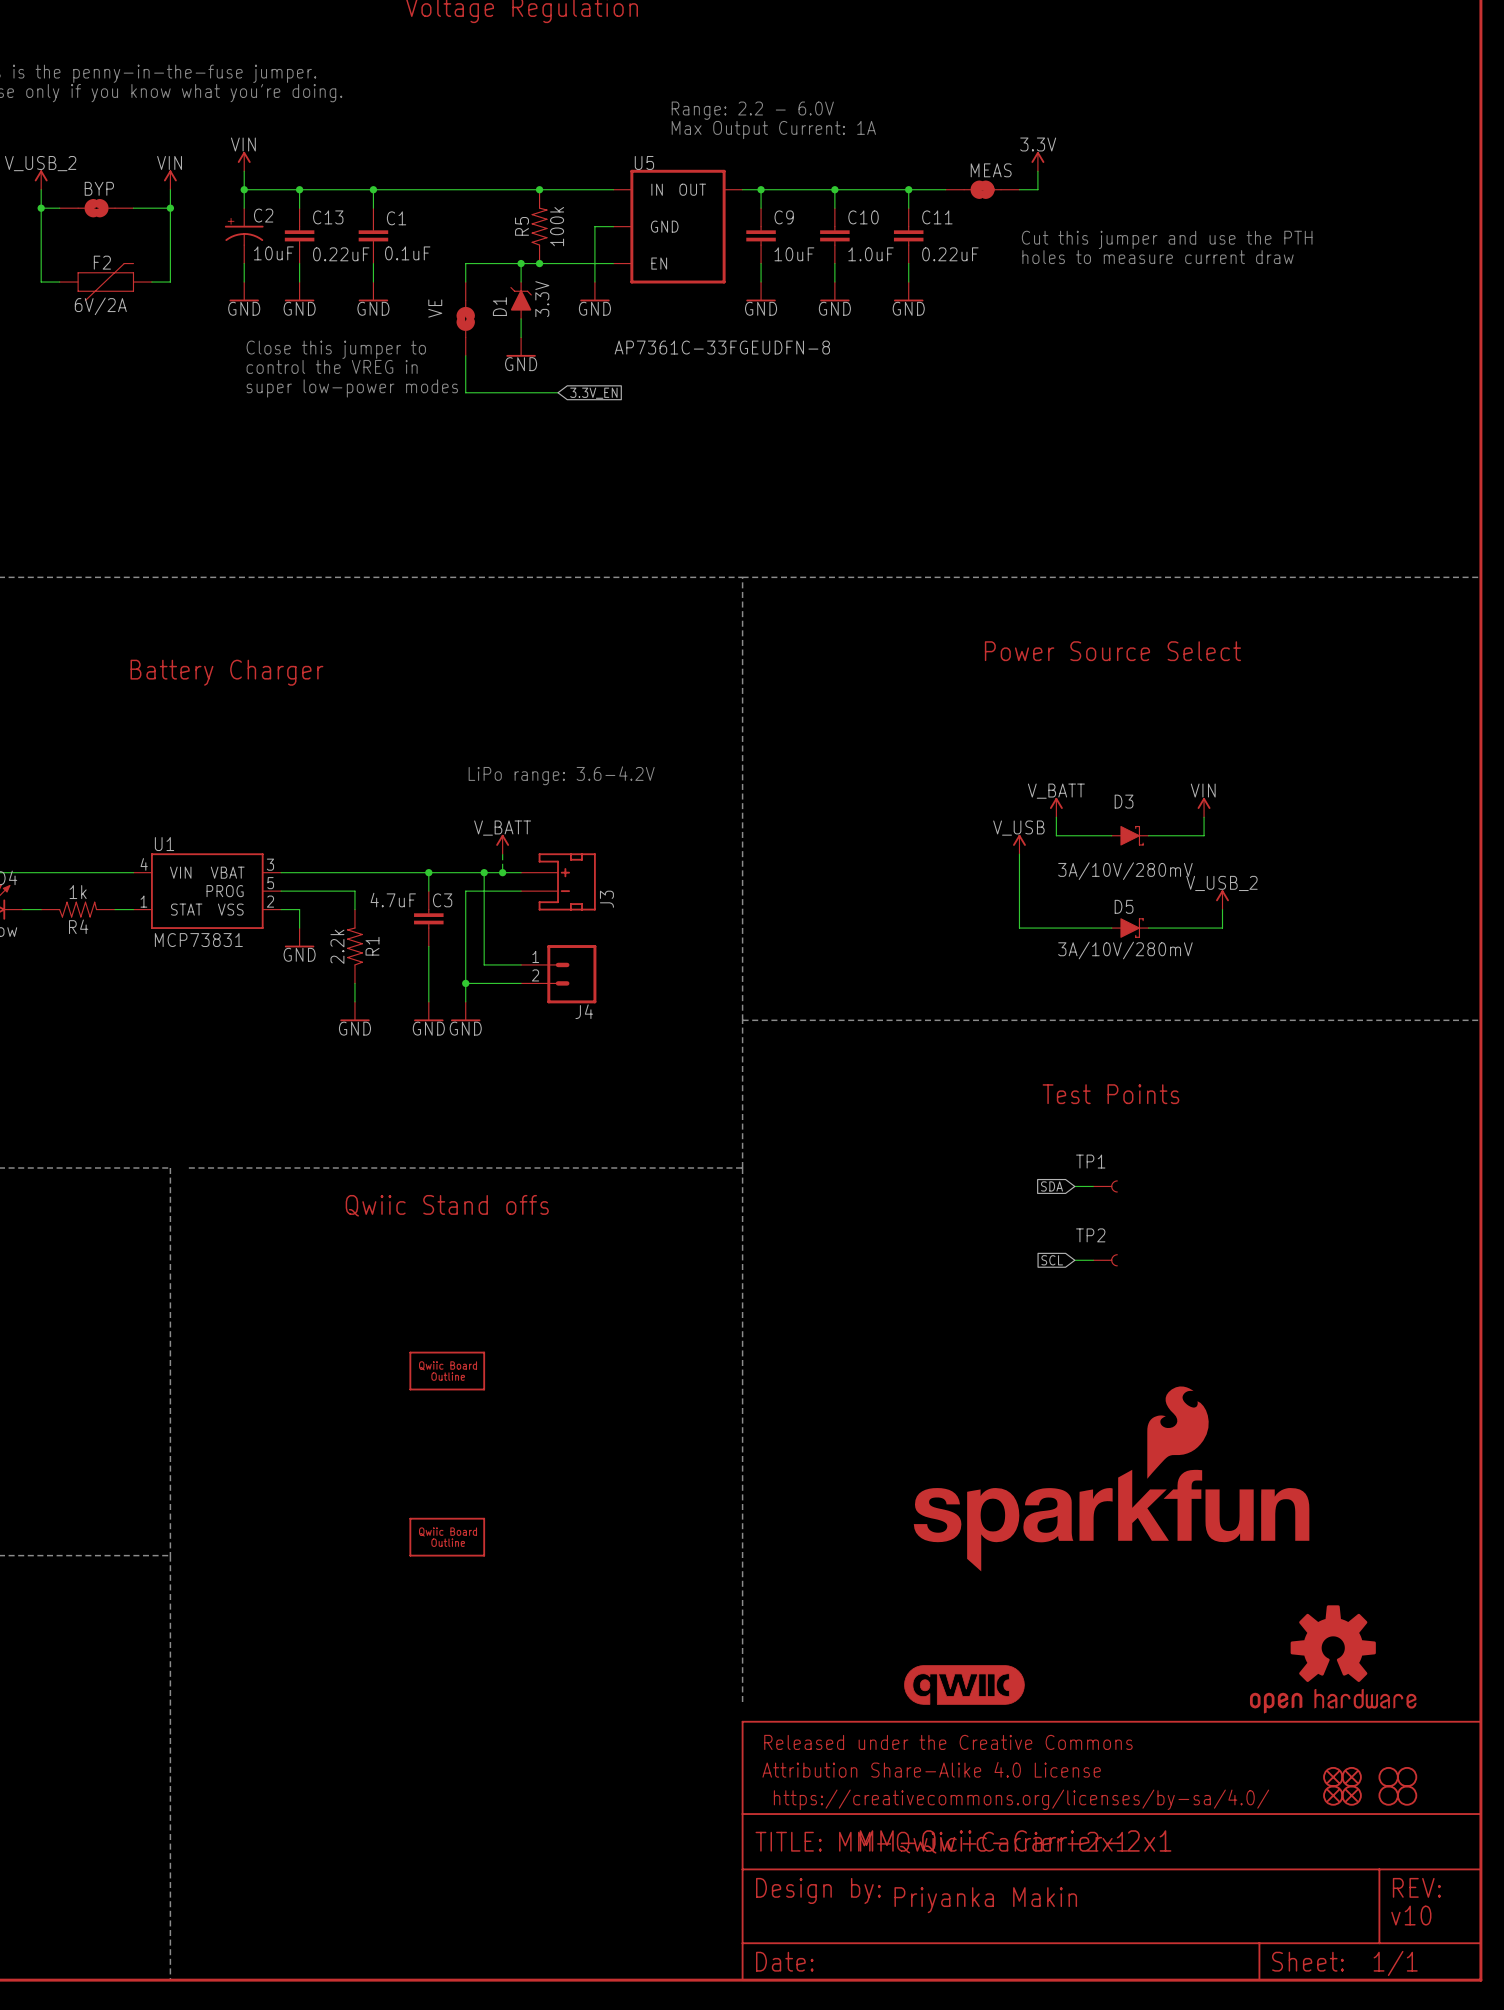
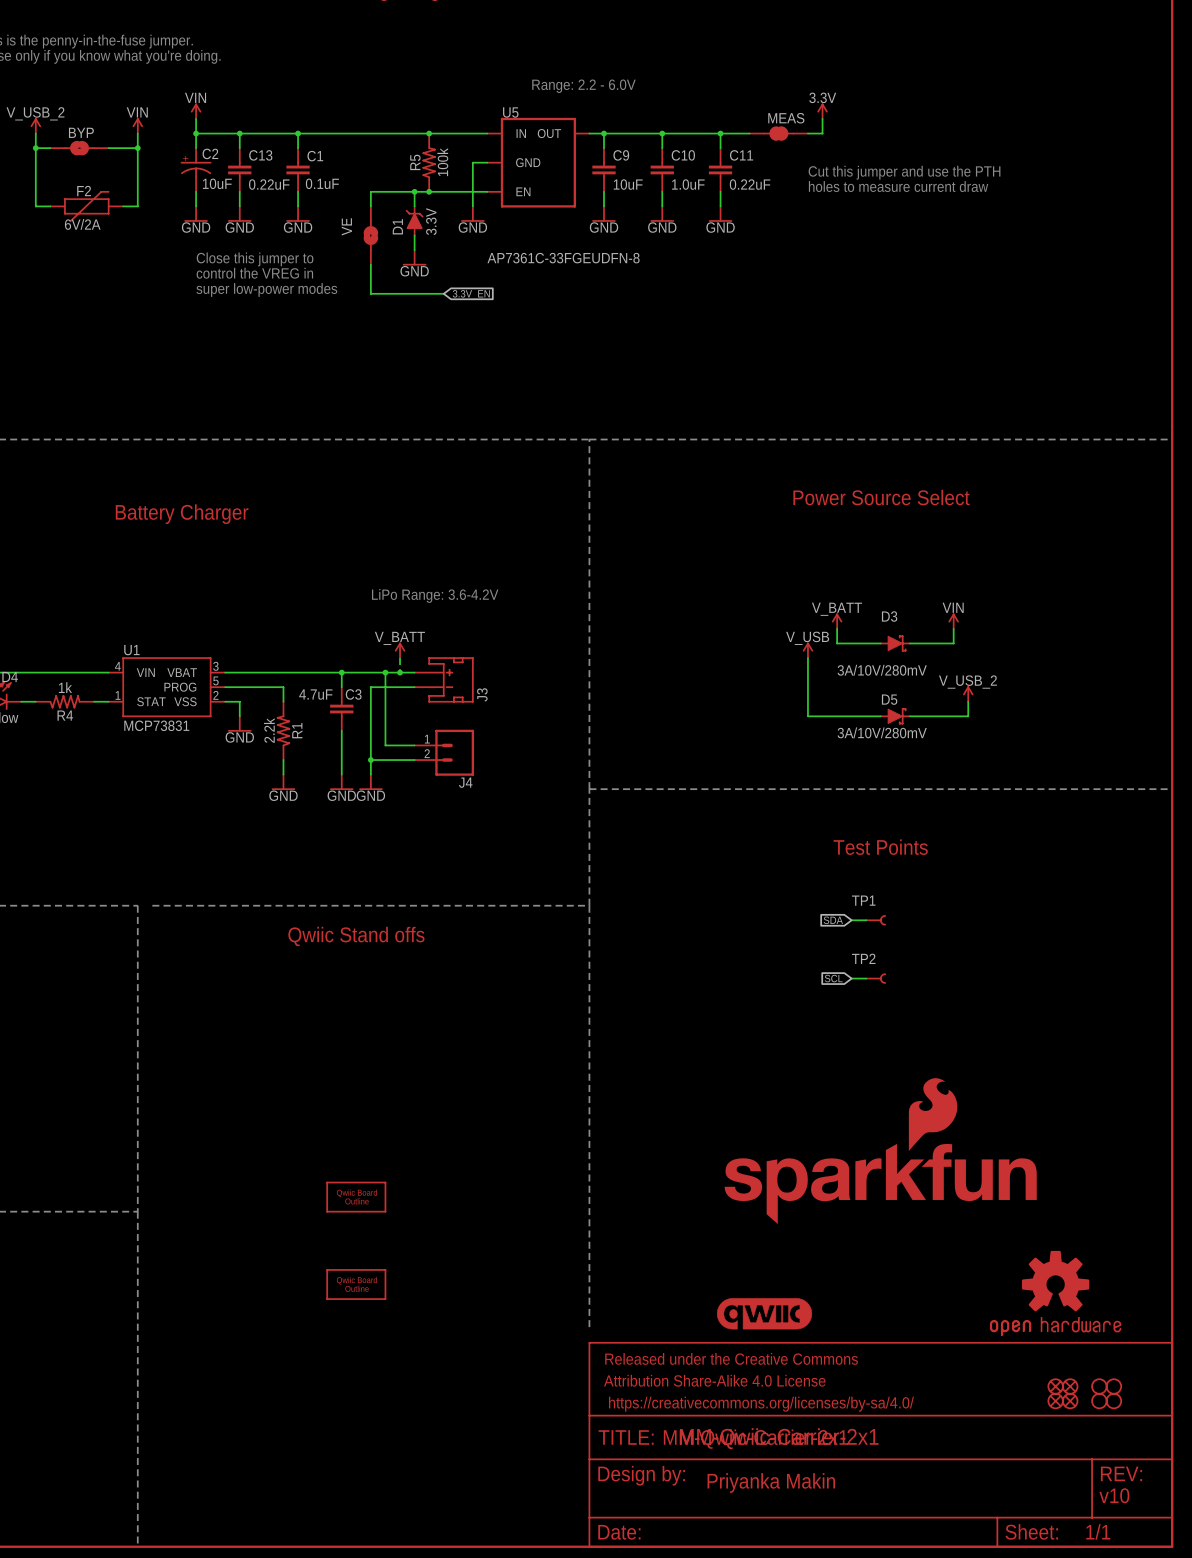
text: Range: 2.2 - 6.0V (752, 110) -> none
text: Max Output Current: 1A (773, 130) -> Range: 2.2 - 6.0V (583, 86)
text: LiPo range: 3.6-4.2V (561, 775) -> LiPo Range: 3.6-4.2V (435, 595)
part: (447, 1371) -> none
part: none -> (356, 1284)

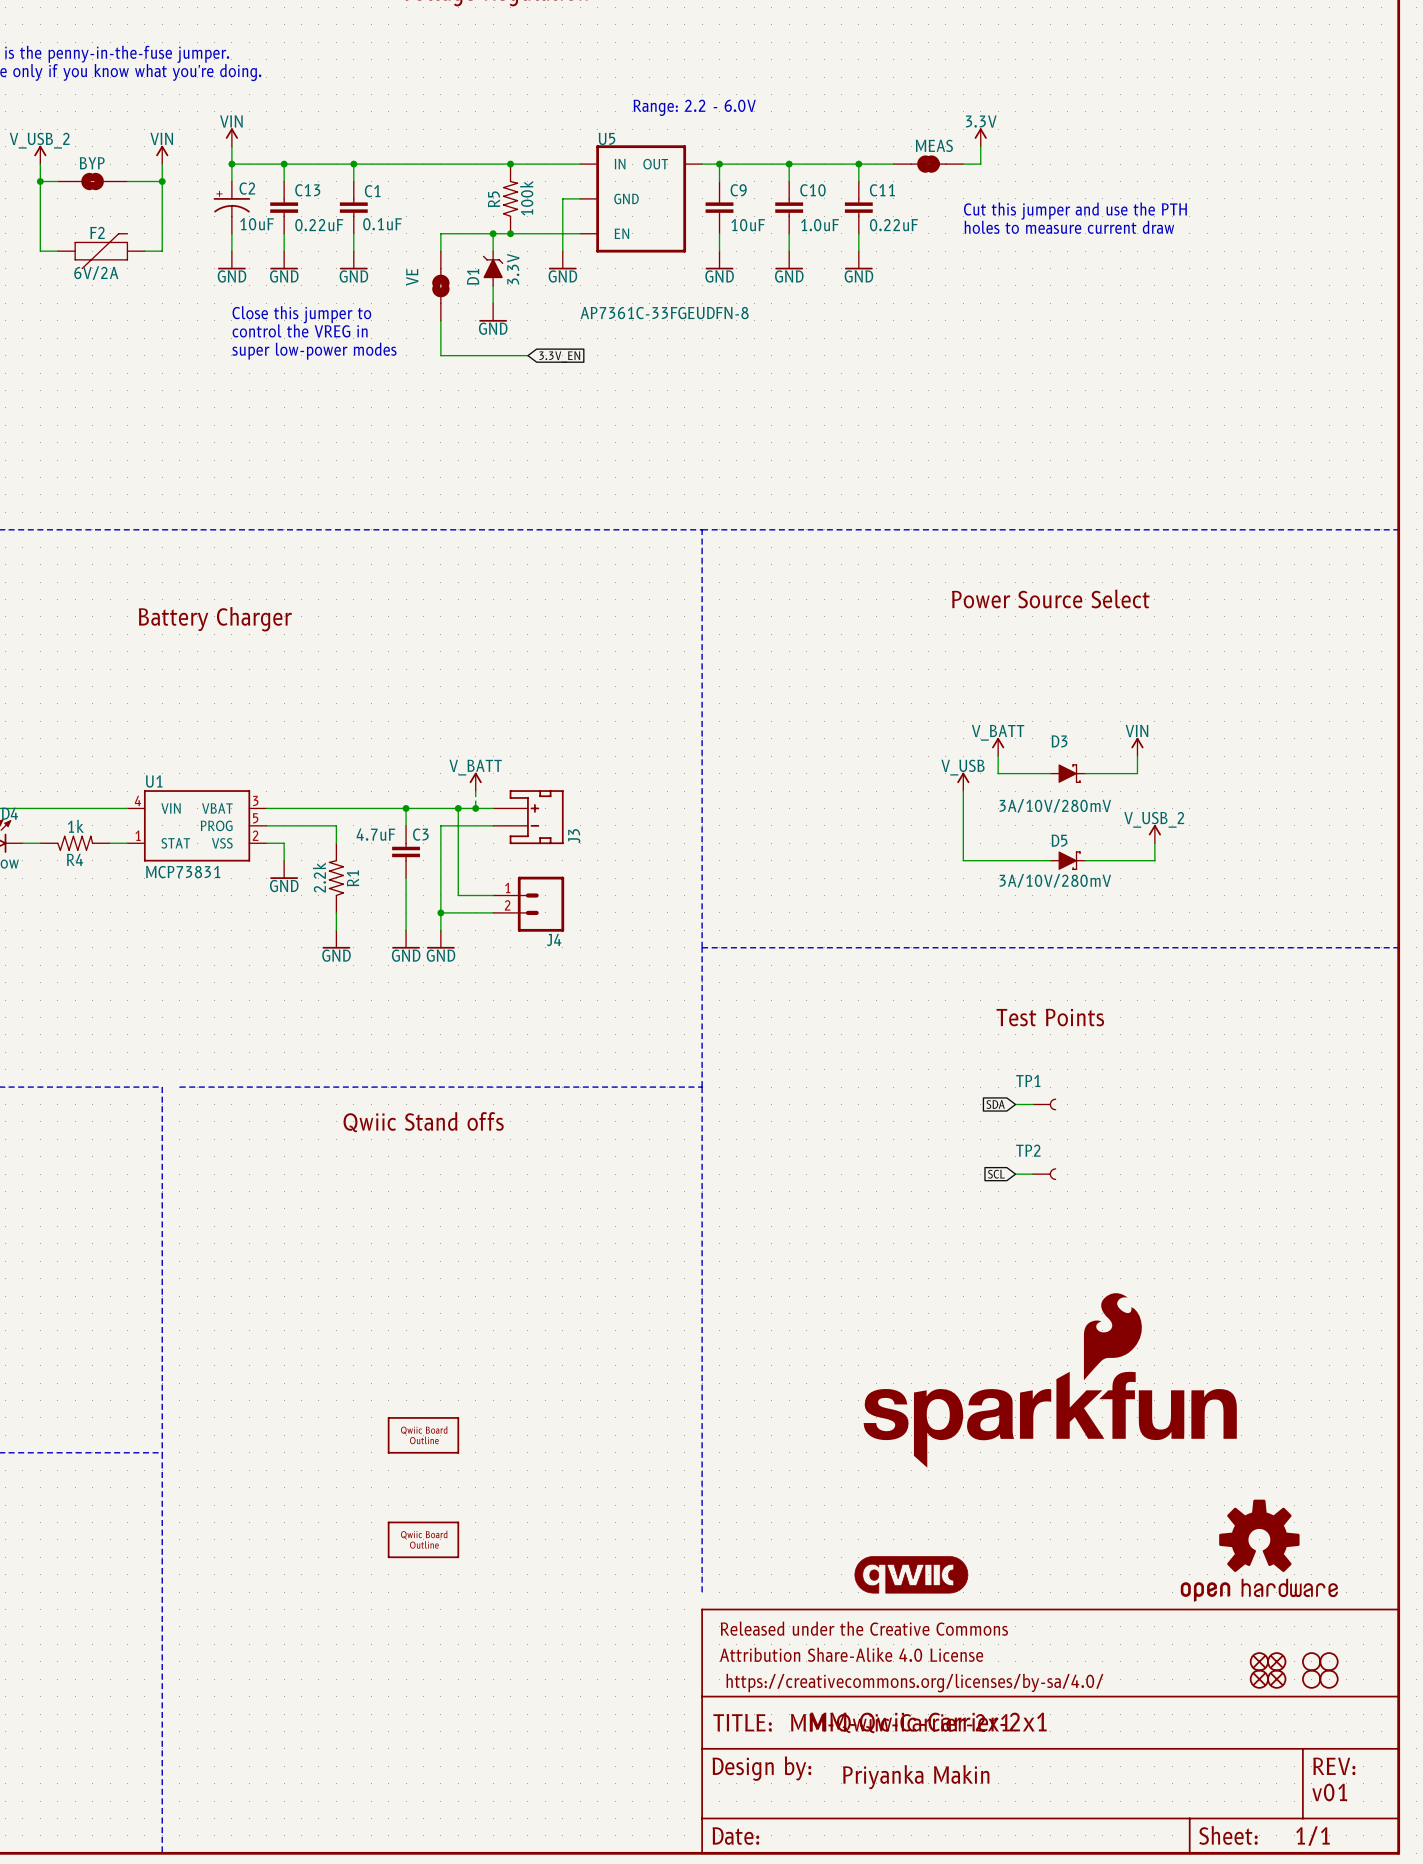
text: LiPo Range: 3.6-4.2V (435, 595) -> none
text: v10 (1114, 1495) -> v01 (1329, 1792)

